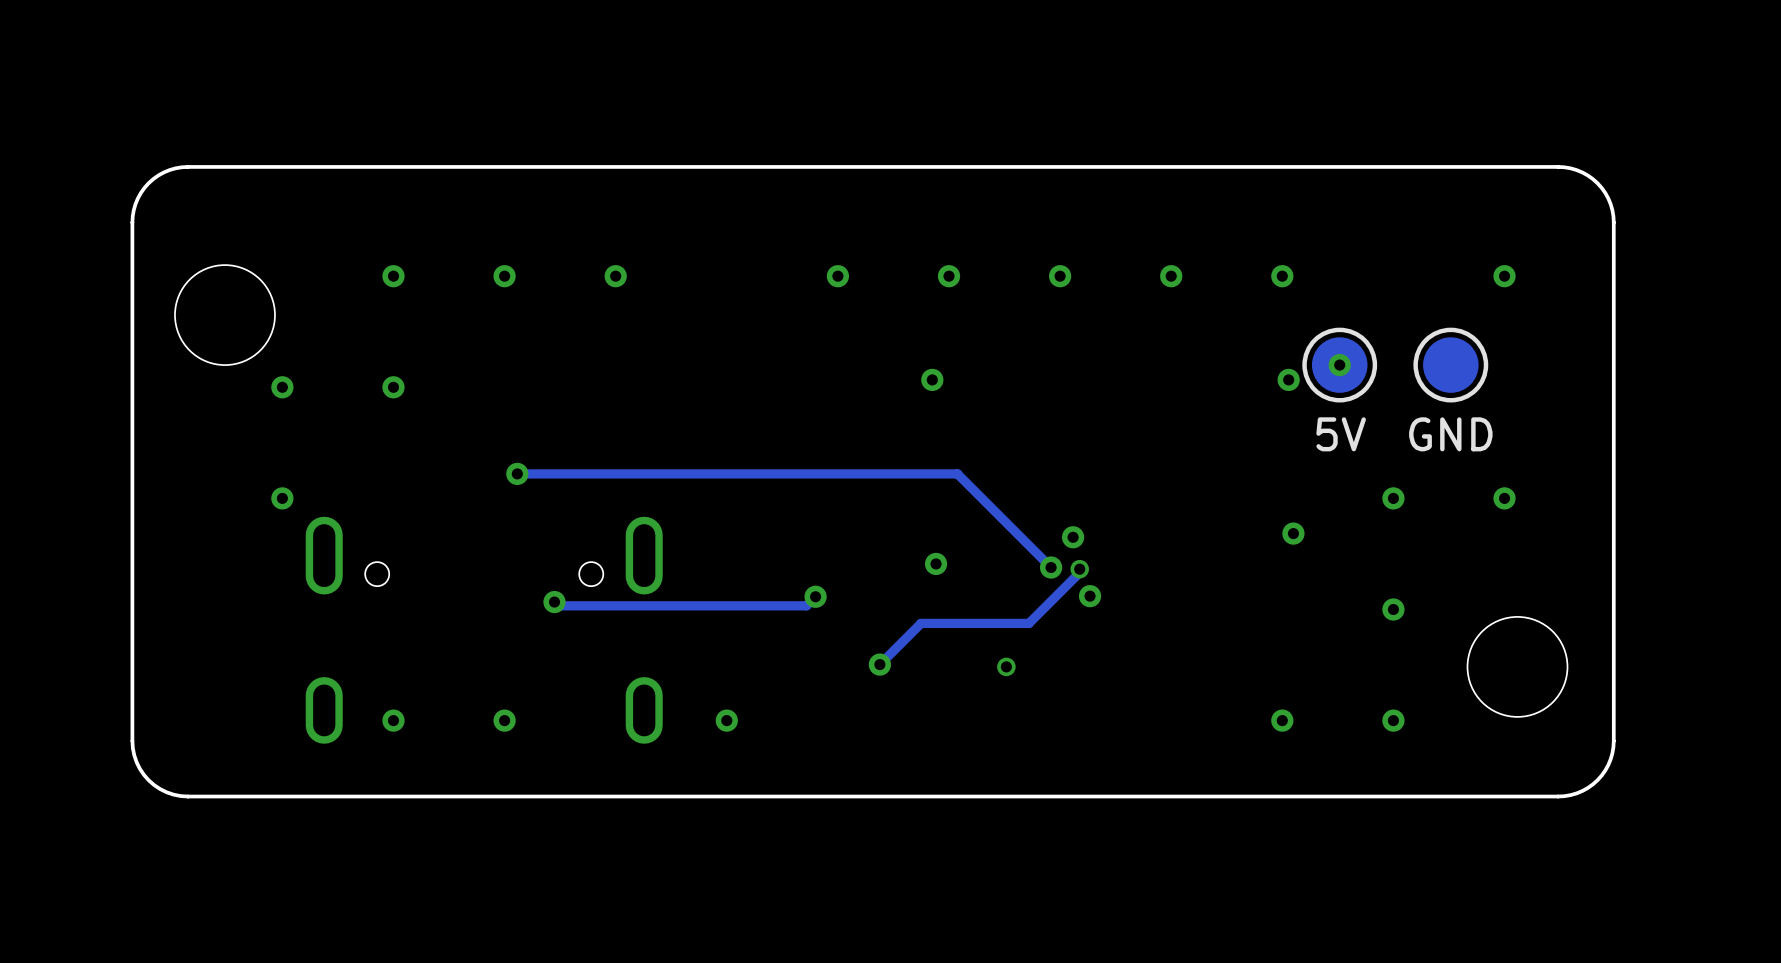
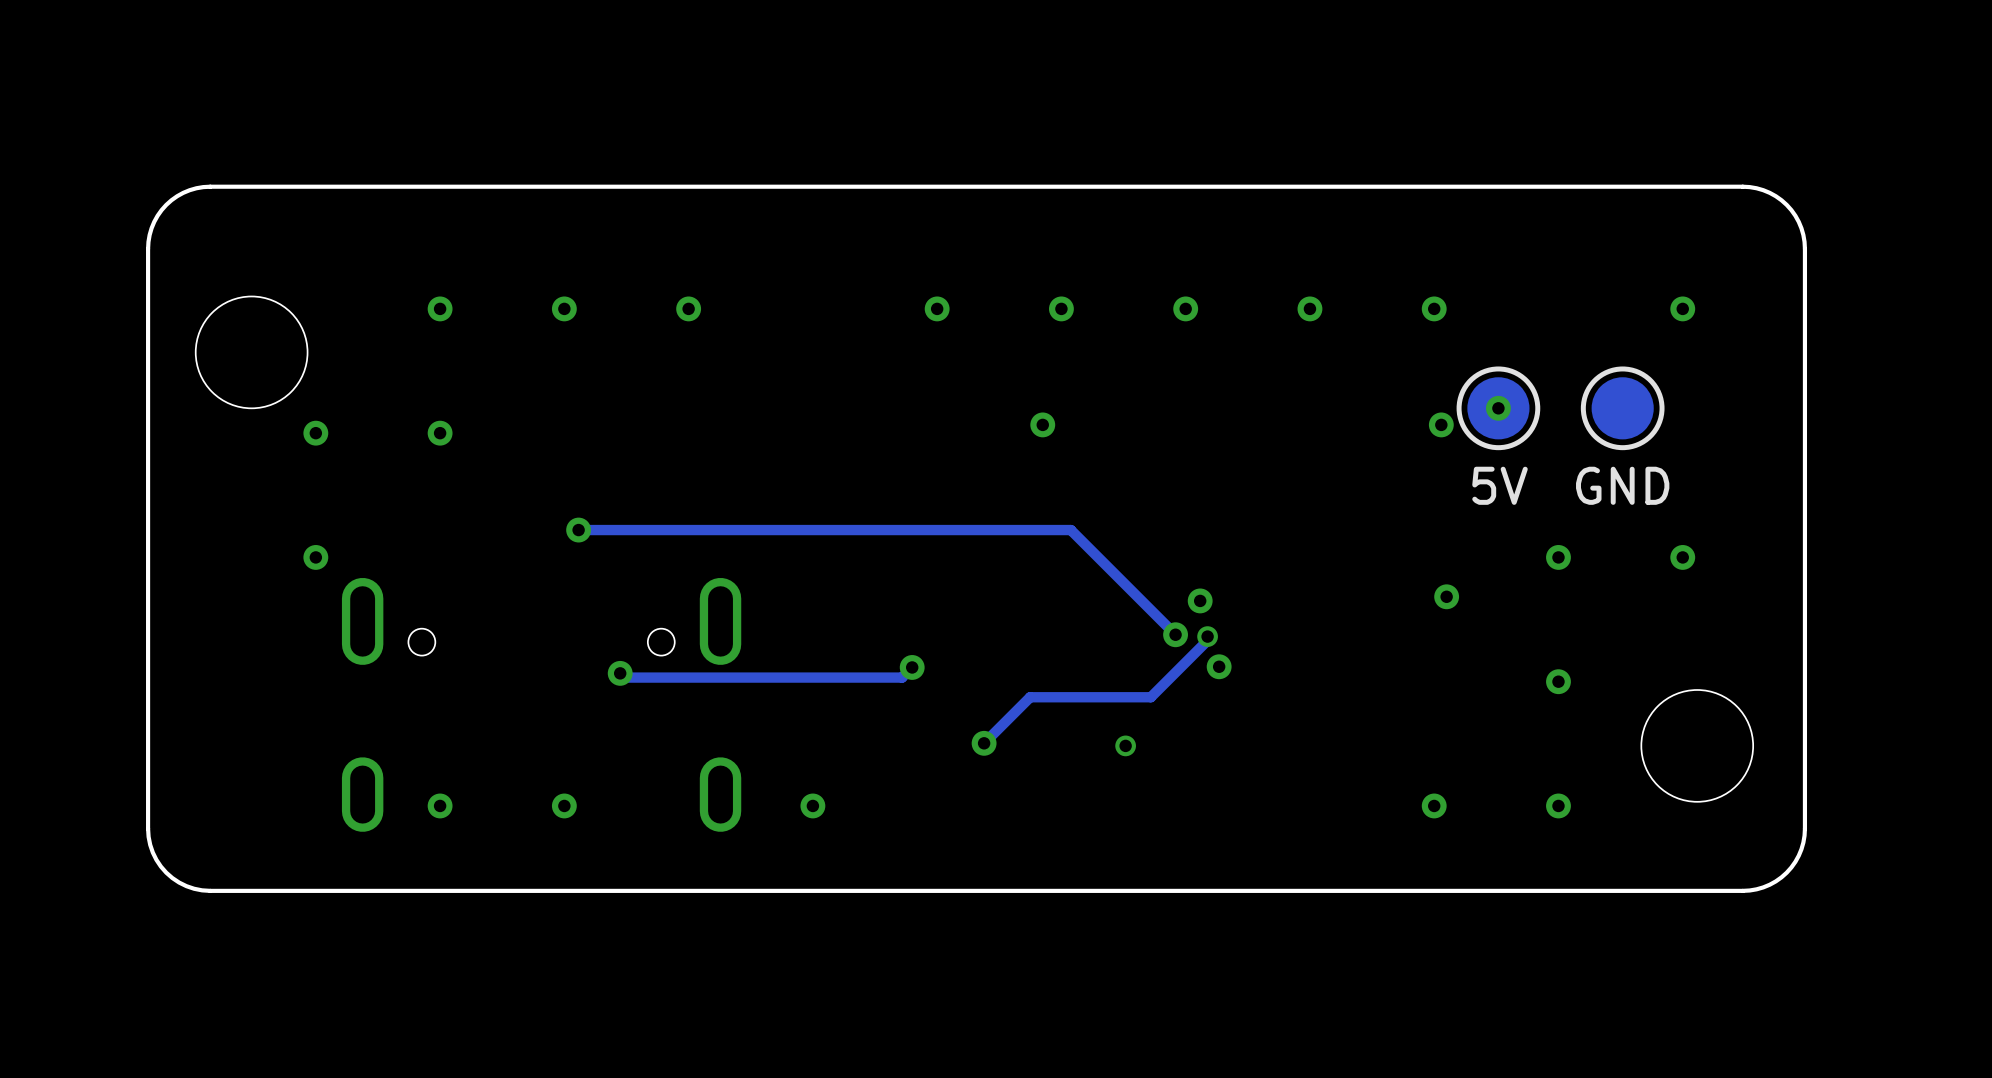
via: (936, 563) -> none

